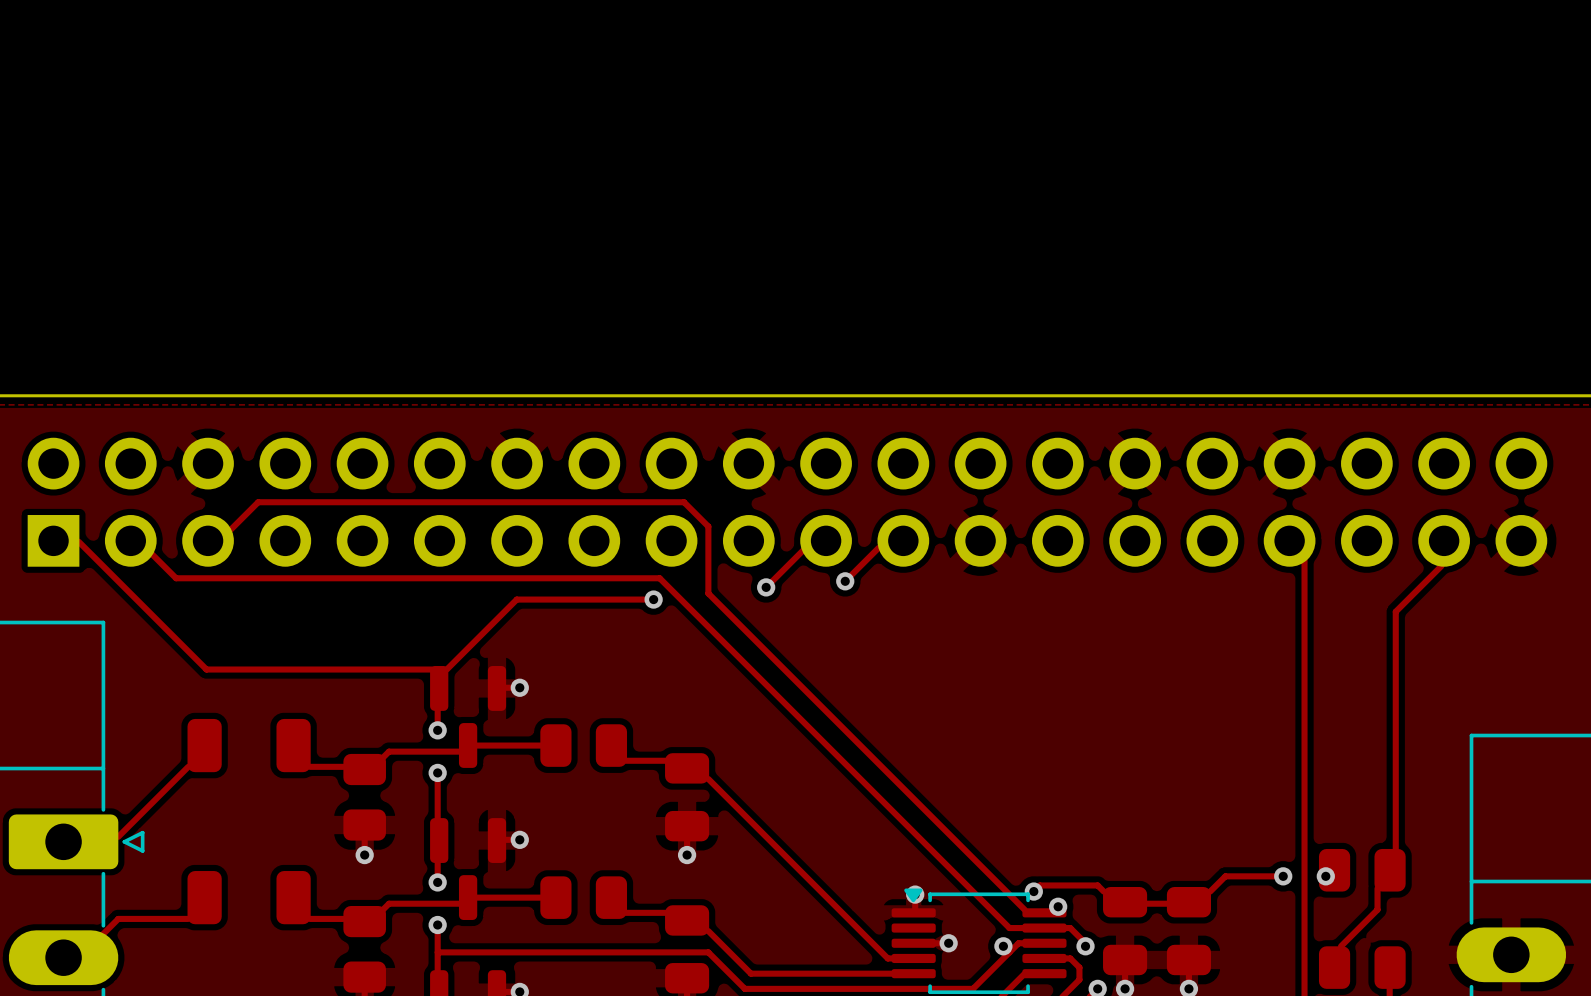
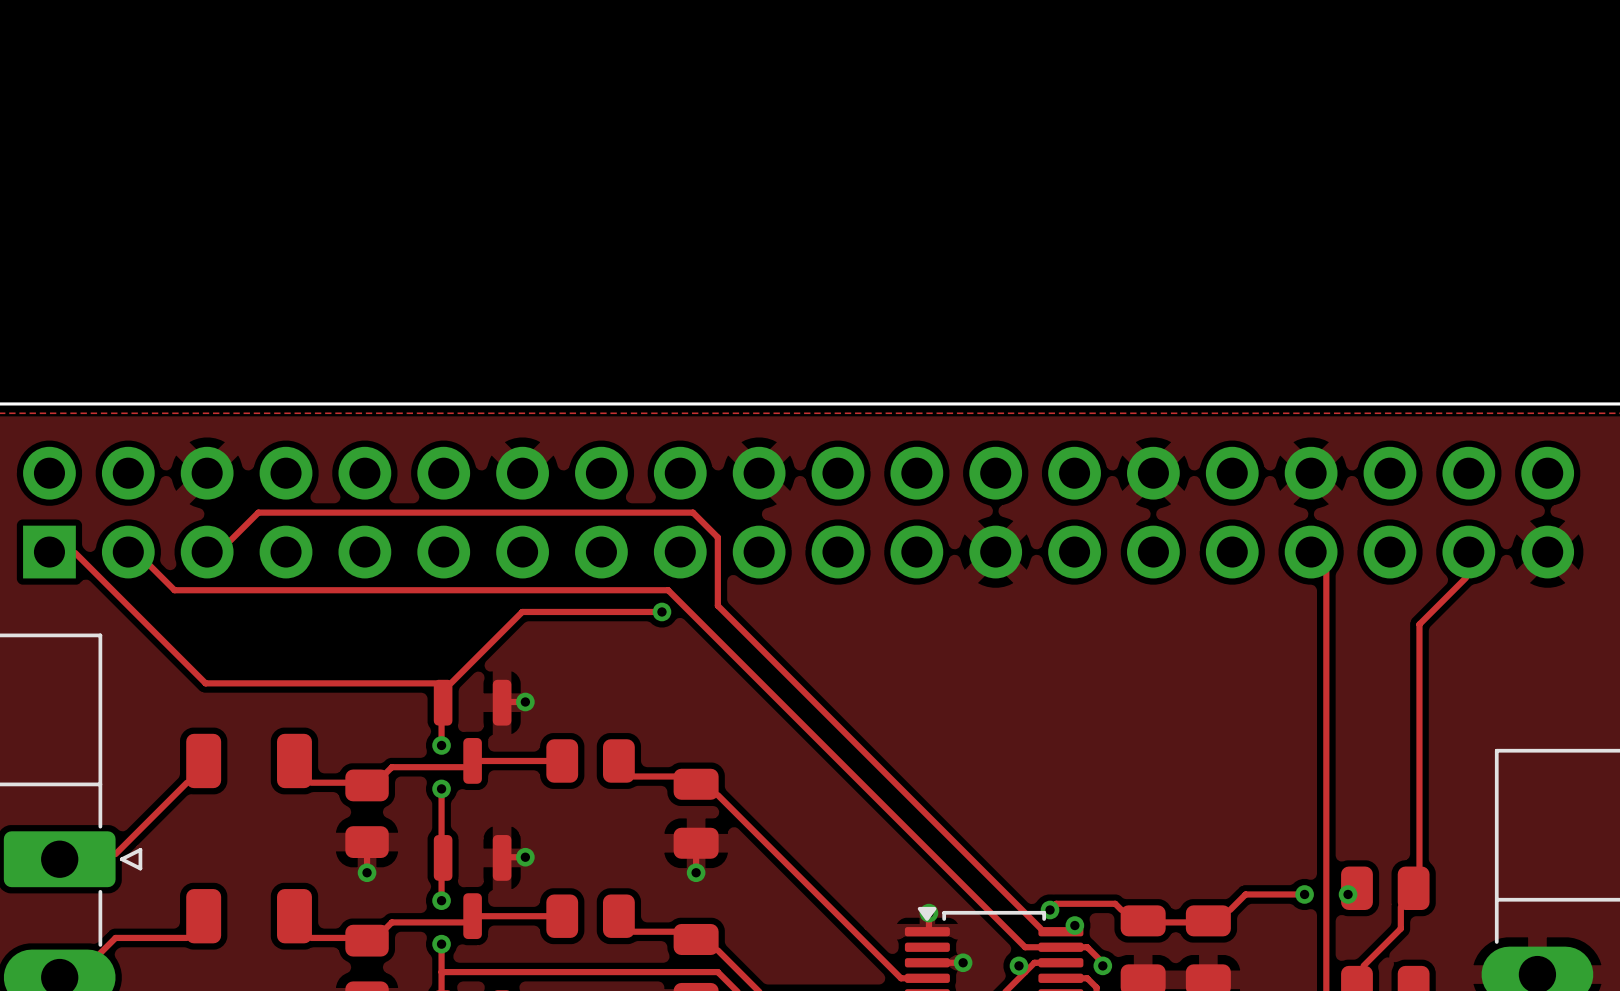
track: (878, 547) (845, 581) -> none
track: (802, 550) (766, 587) -> none
via: (845, 581) -> none
via: (766, 587) -> none

